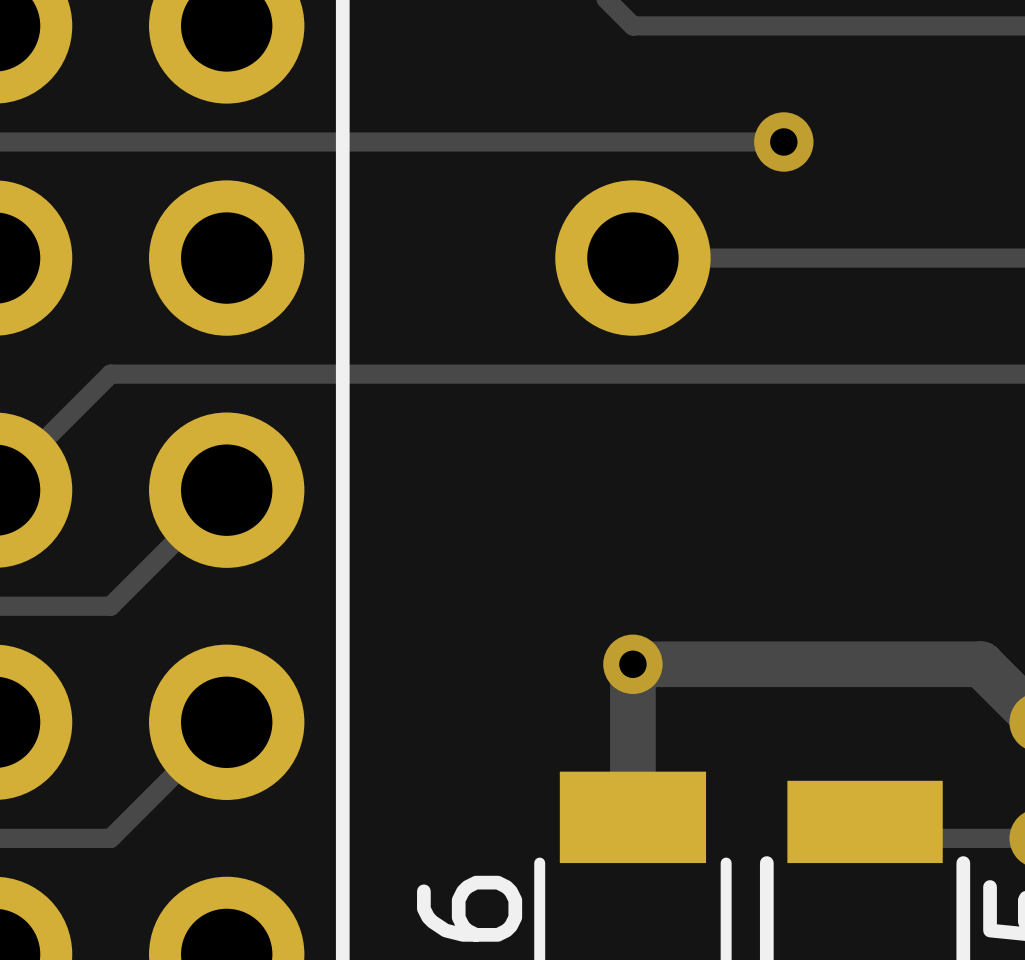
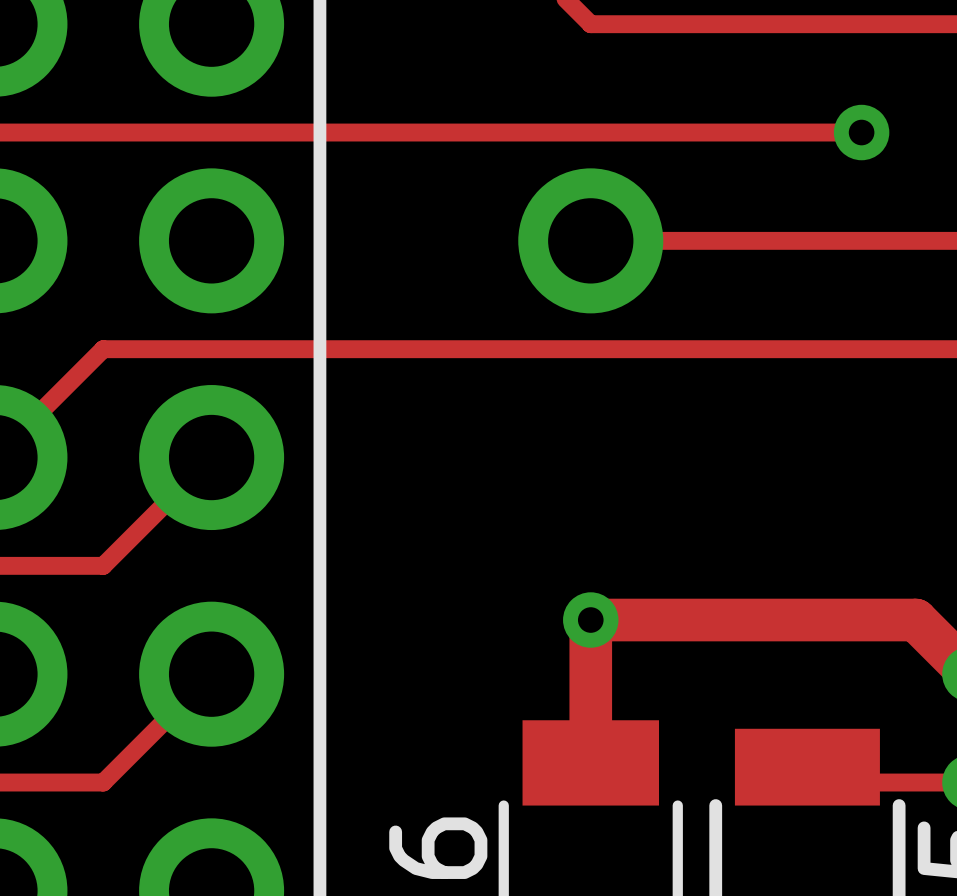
track: none -> (731, 132) (861, 132)
via position: (783, 141) -> (861, 132)

